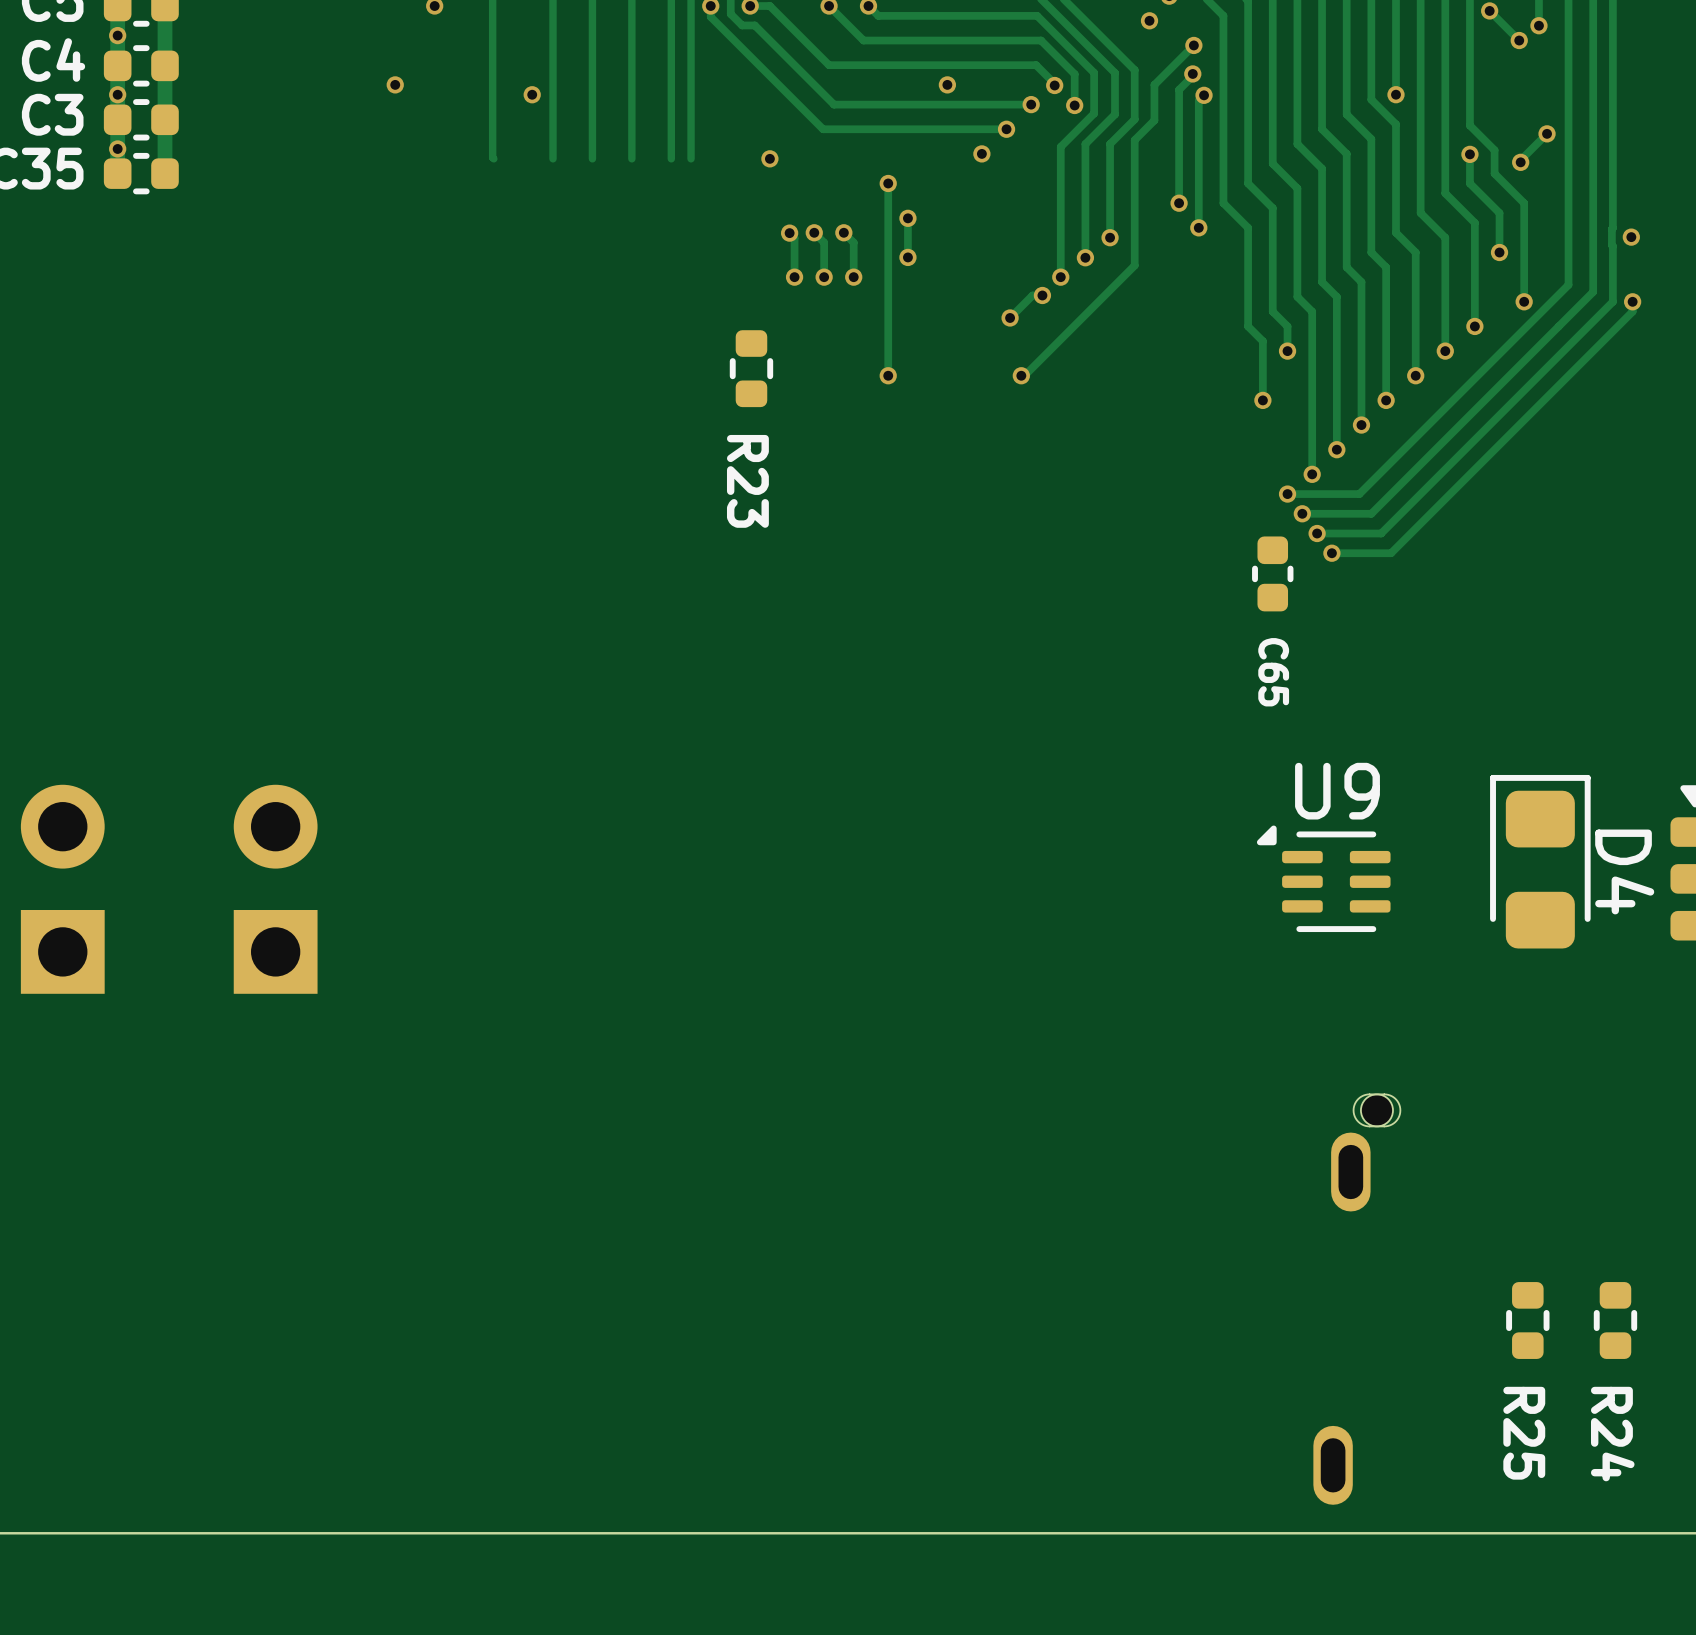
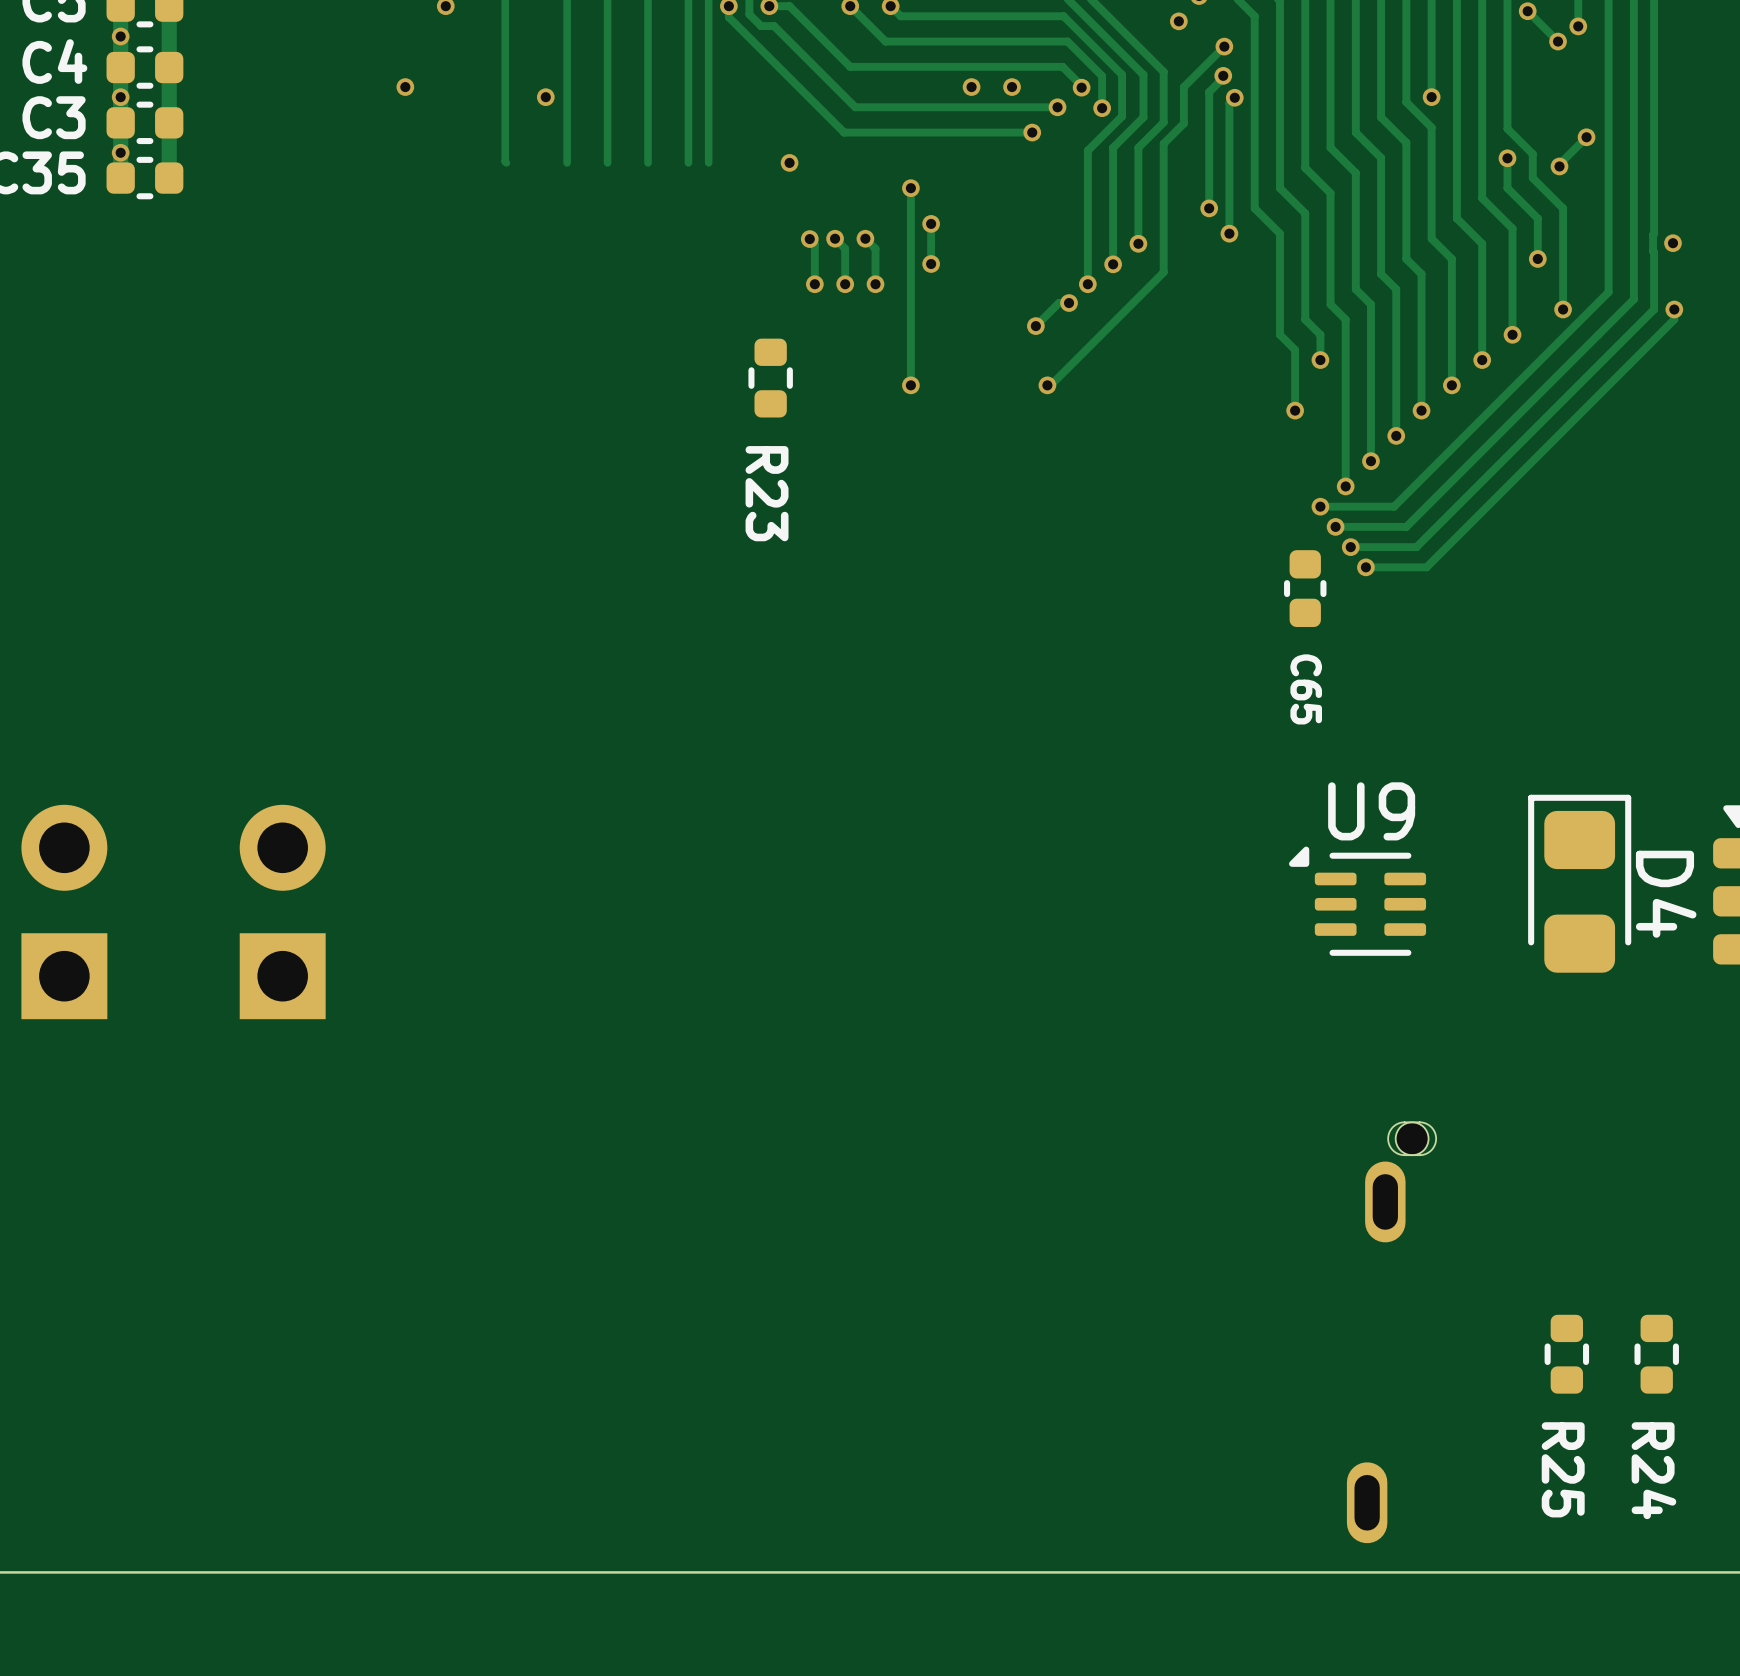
via position: (981, 153) -> (1012, 87)

